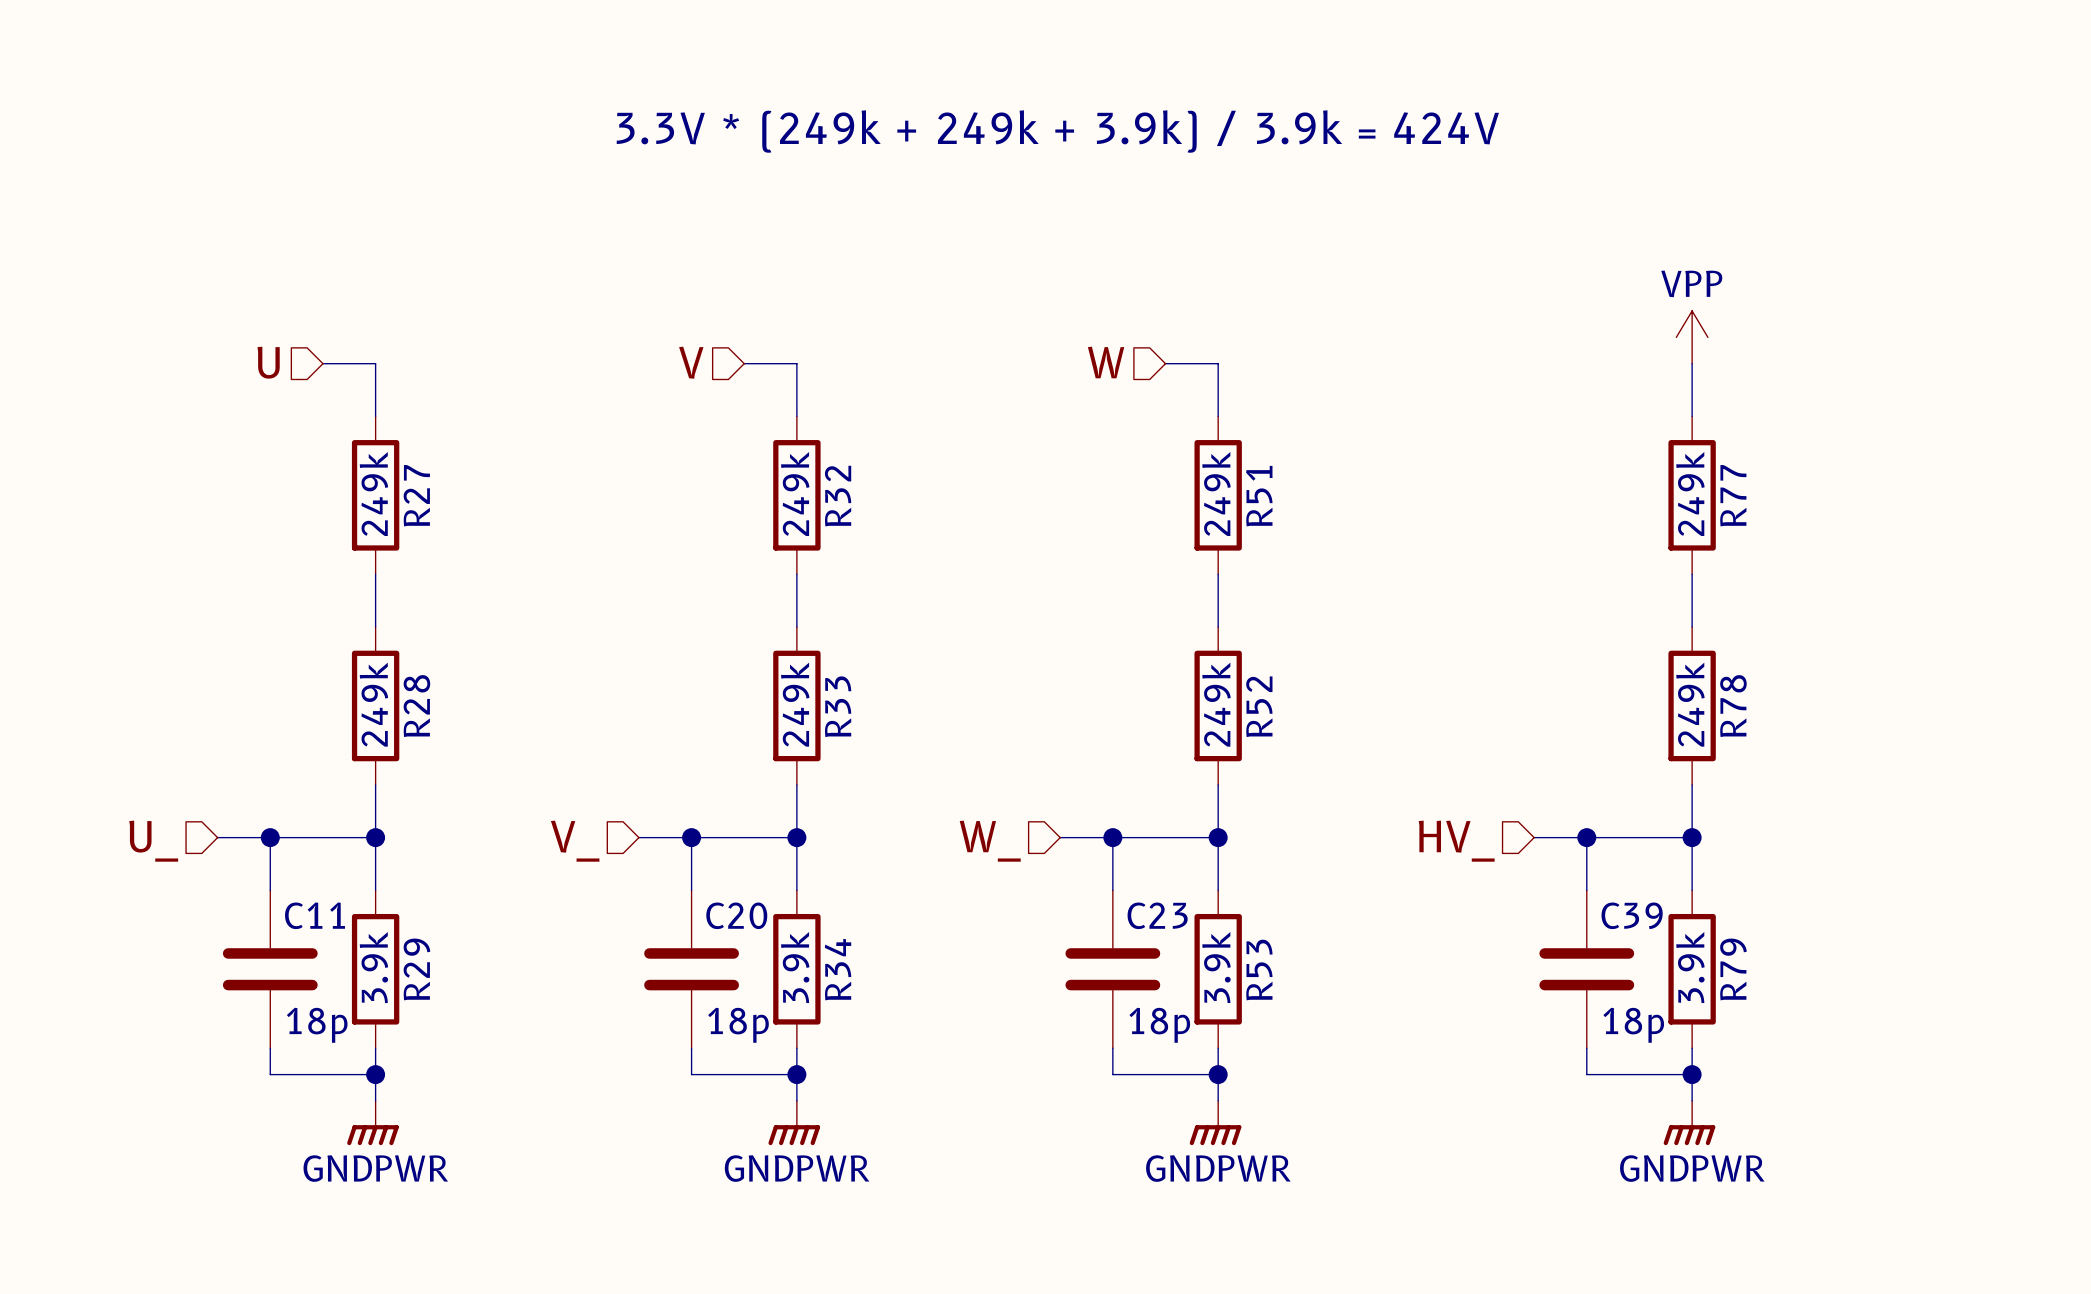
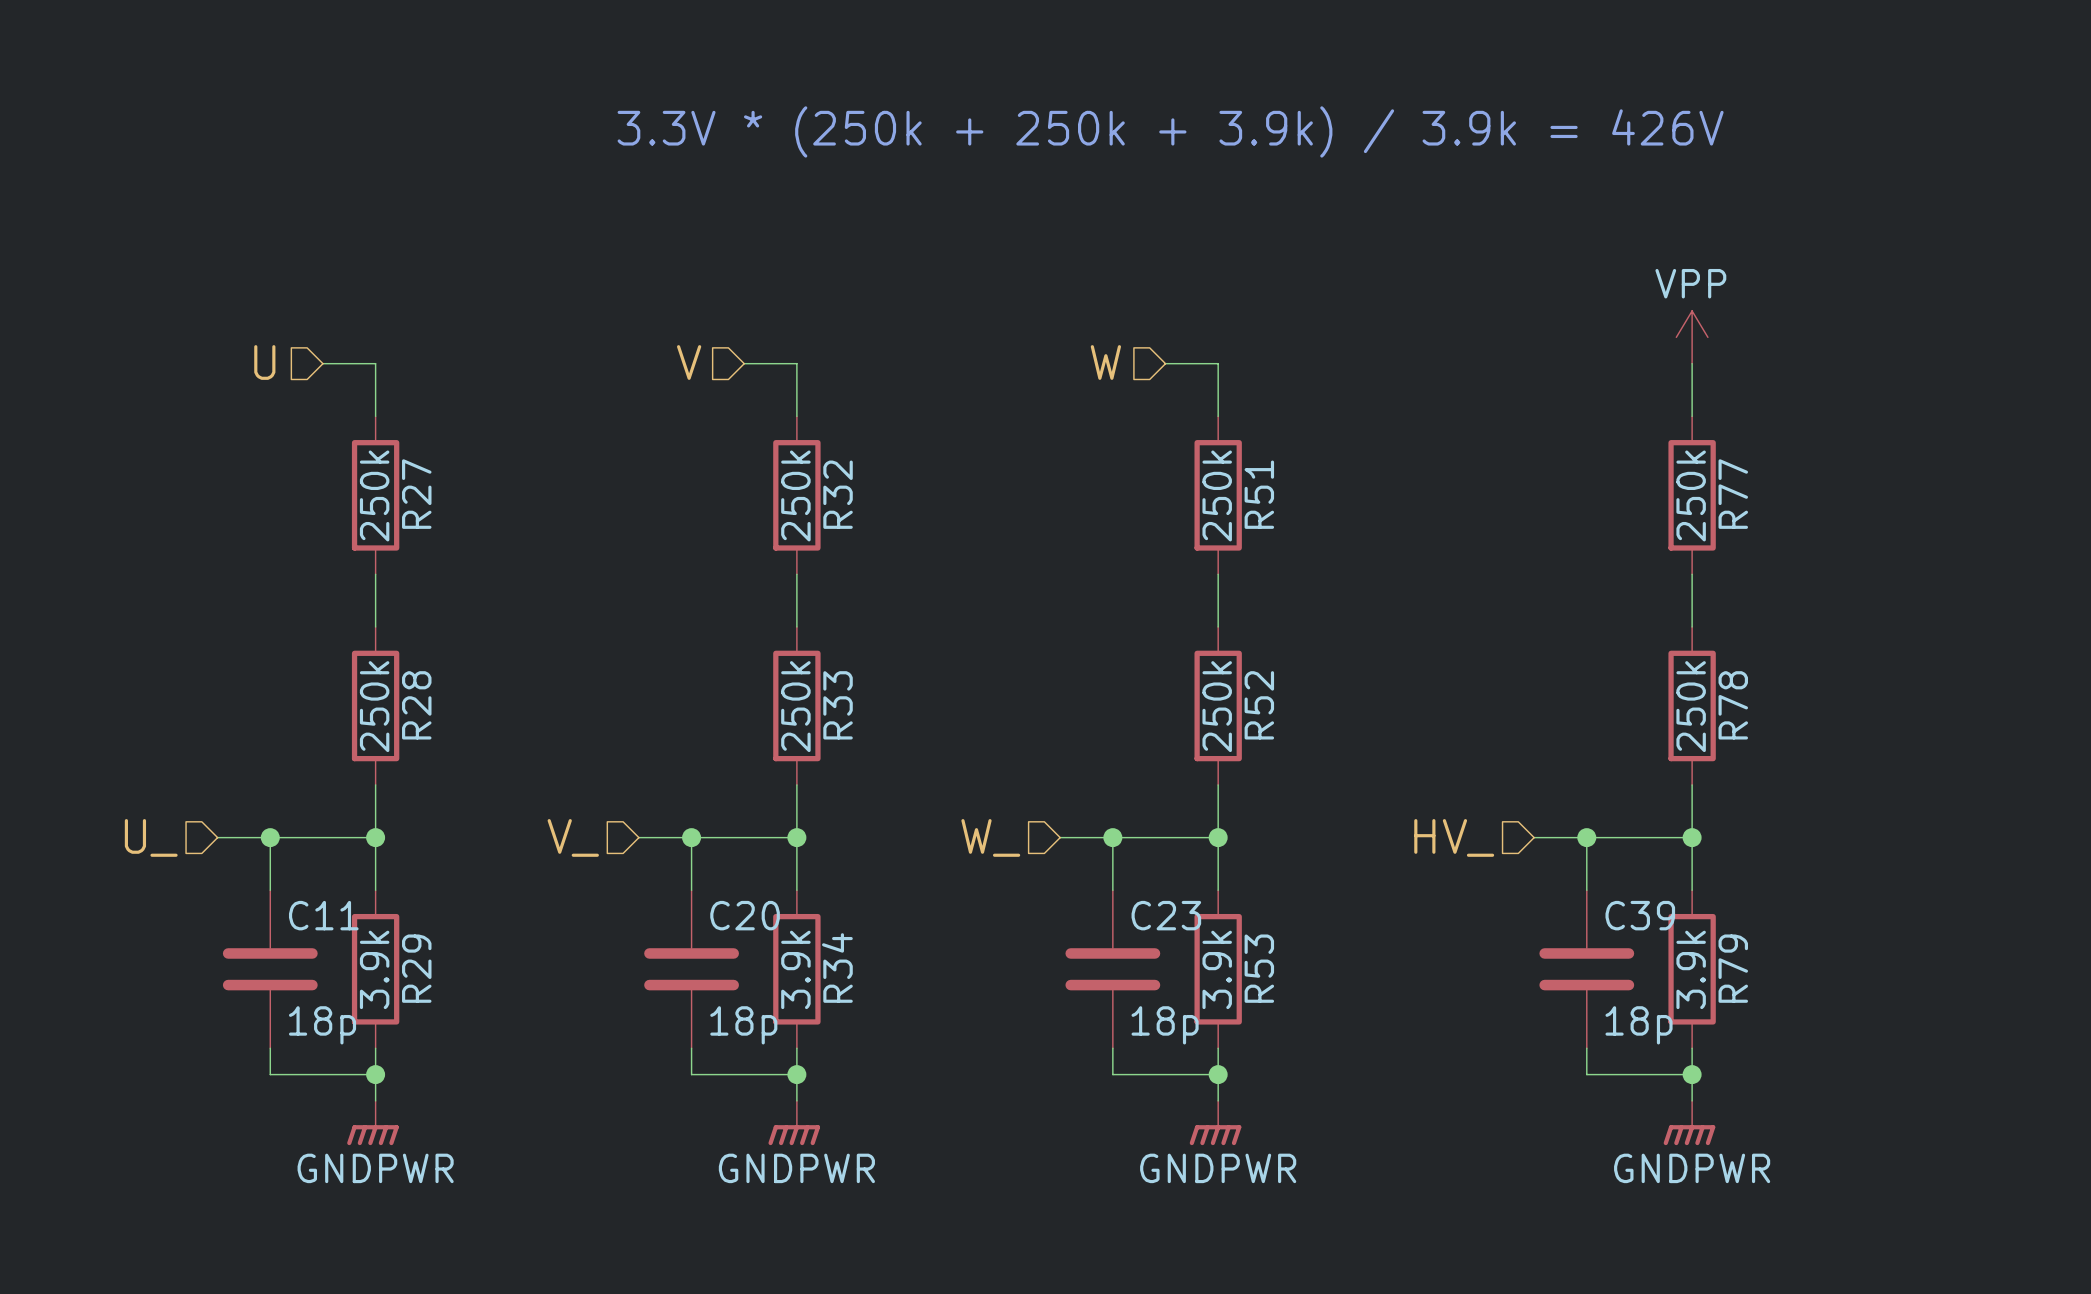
text: 3.3V * (249k + 249k + 3.9k) / 3.9k = 424V (1057, 131) -> 3.3V * (250k + 250k + 3.9k) / 3.9k = 426V (1170, 131)
R27 value: 249k (373, 494) -> 250k (374, 495)
R32 value: 249k (795, 494) -> 250k (795, 495)
R51 value: 249k (1216, 494) -> 250k (1217, 495)
R77 value: 249k (1690, 494) -> 250k (1691, 495)
R28 value: 249k (373, 704) -> 250k (374, 706)
R33 value: 249k (795, 704) -> 250k (795, 706)
R52 value: 249k (1216, 704) -> 250k (1217, 706)
R78 value: 249k (1690, 704) -> 250k (1691, 706)

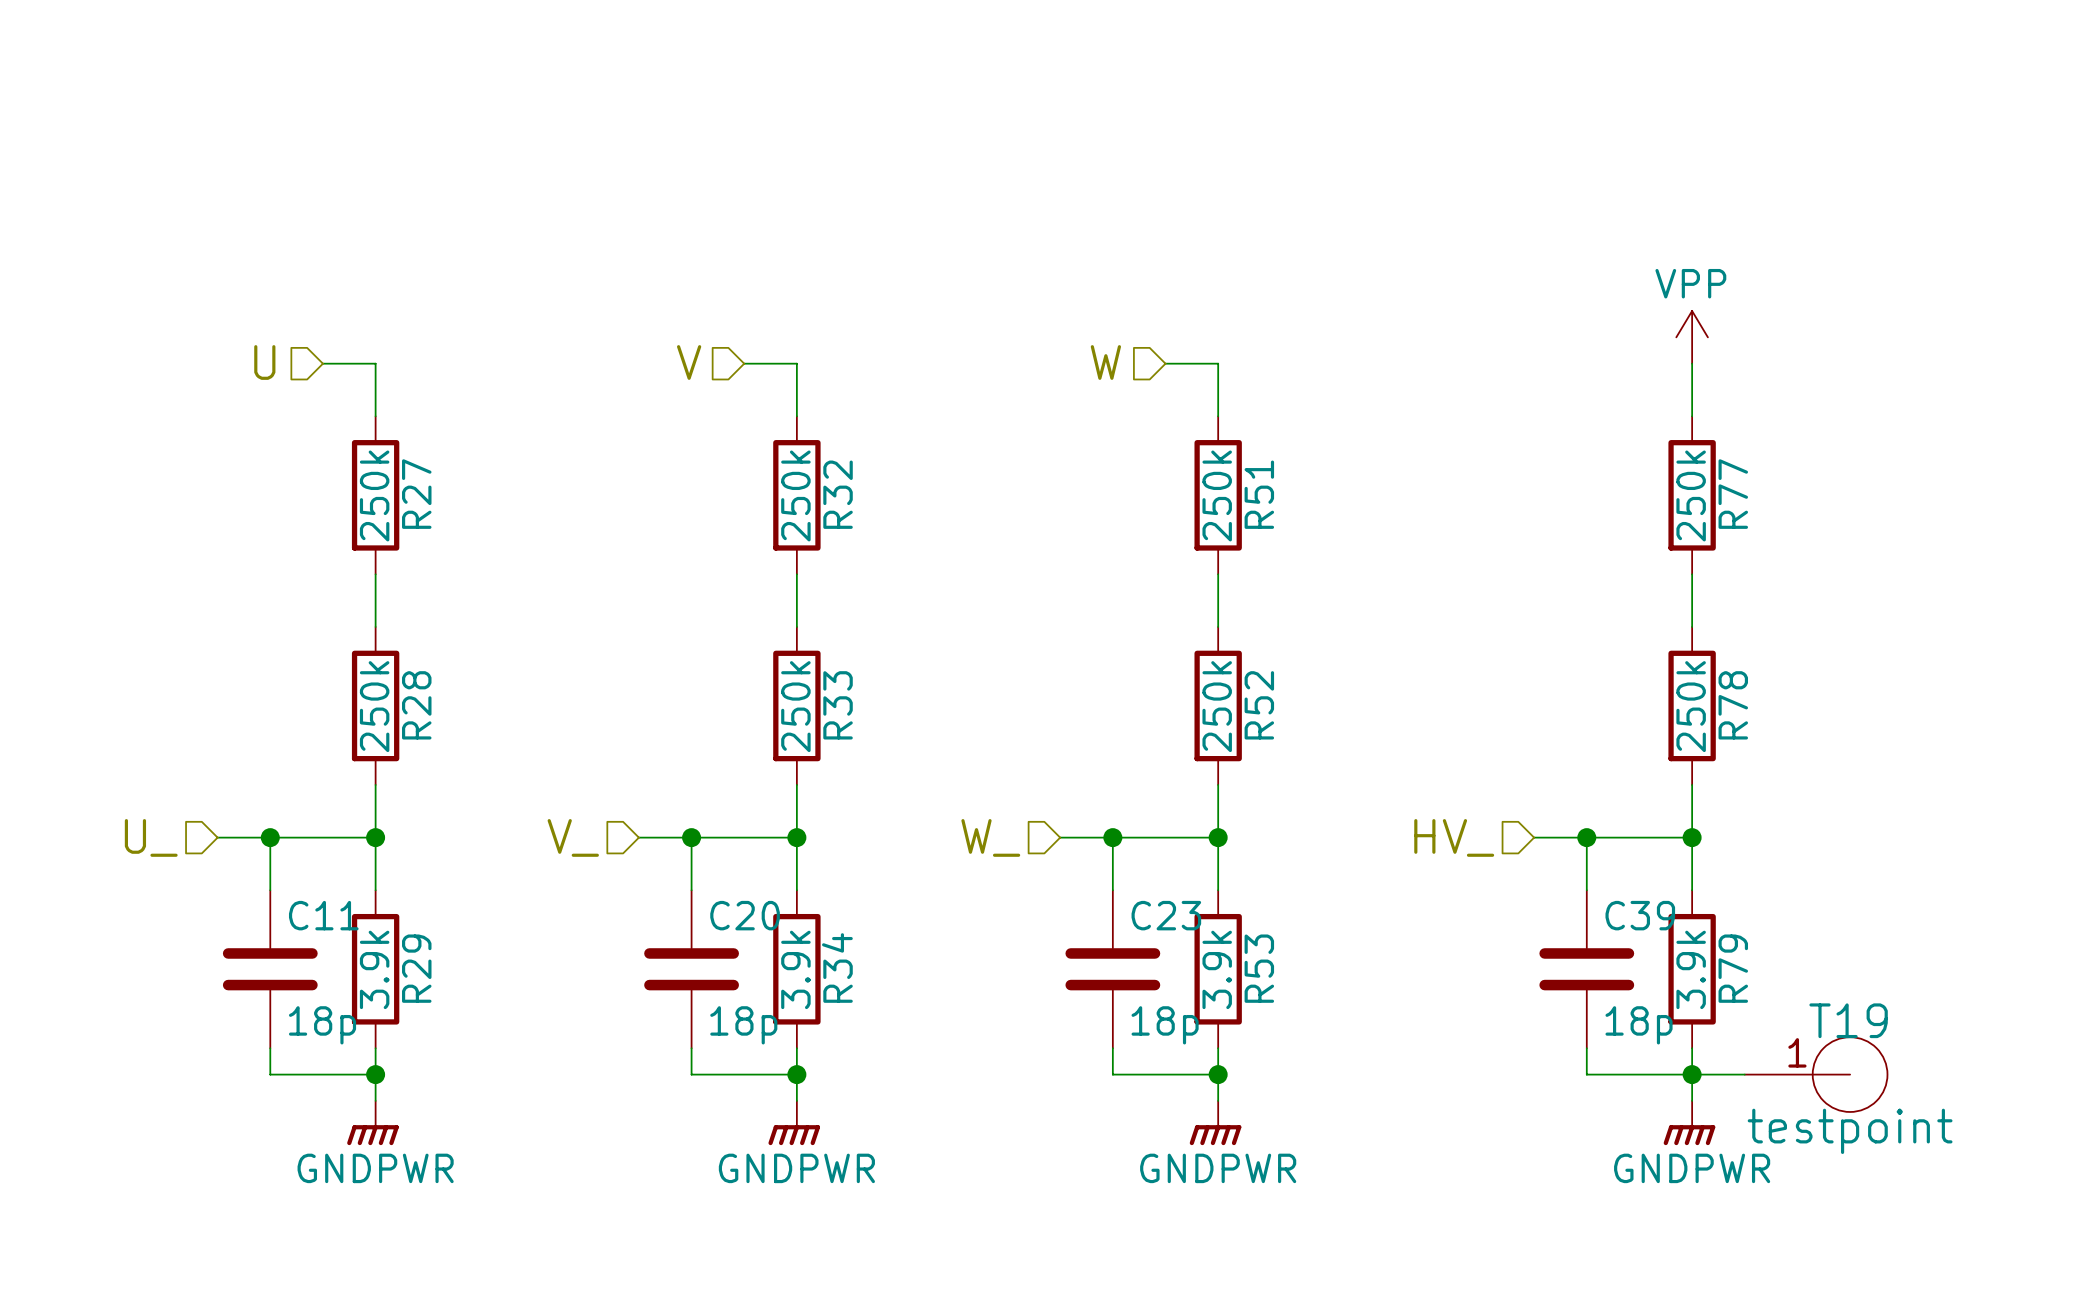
text: 3.3V * (250k + 250k + 3.9k) / 3.9k = 426V (1170, 131) -> none
wire: none -> (1692, 1074) (1744, 1074)
T19: none -> testpoint (1816, 1074)

